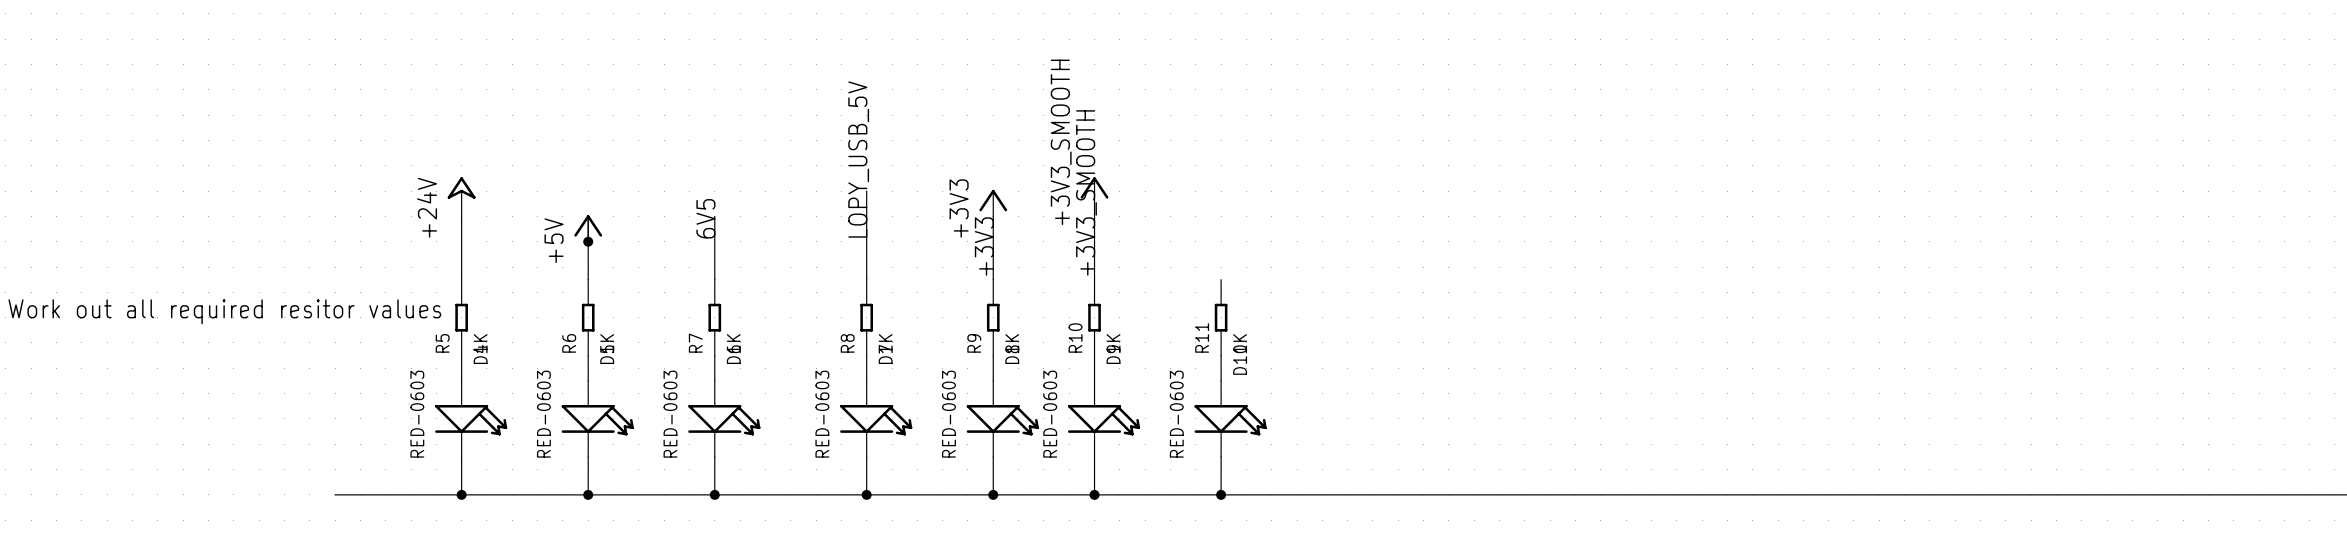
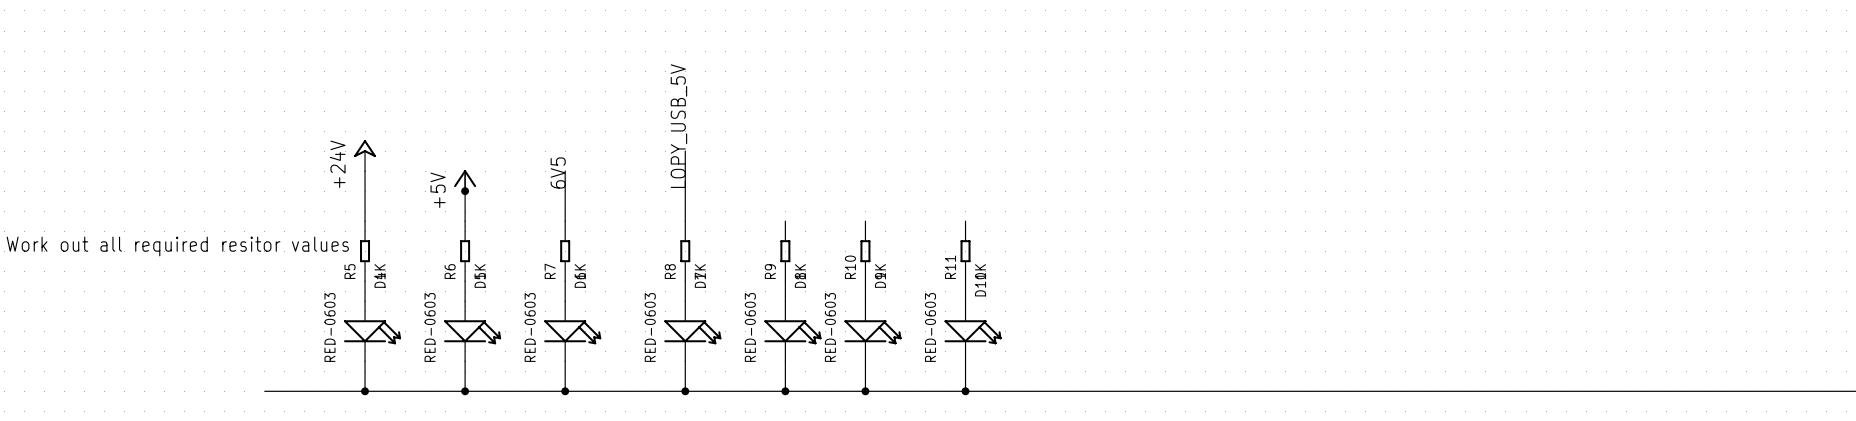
power symbol: +3V3_SMOOTH (1094, 190) -> none
label: +3V3_SMOOTH (1086, 192) -> none
power symbol: +3V3 (993, 203) -> none
wire: (1094, 203) (1094, 279) -> none
wire: (993, 216) (993, 279) -> none
label: +3V3 (984, 246) -> none

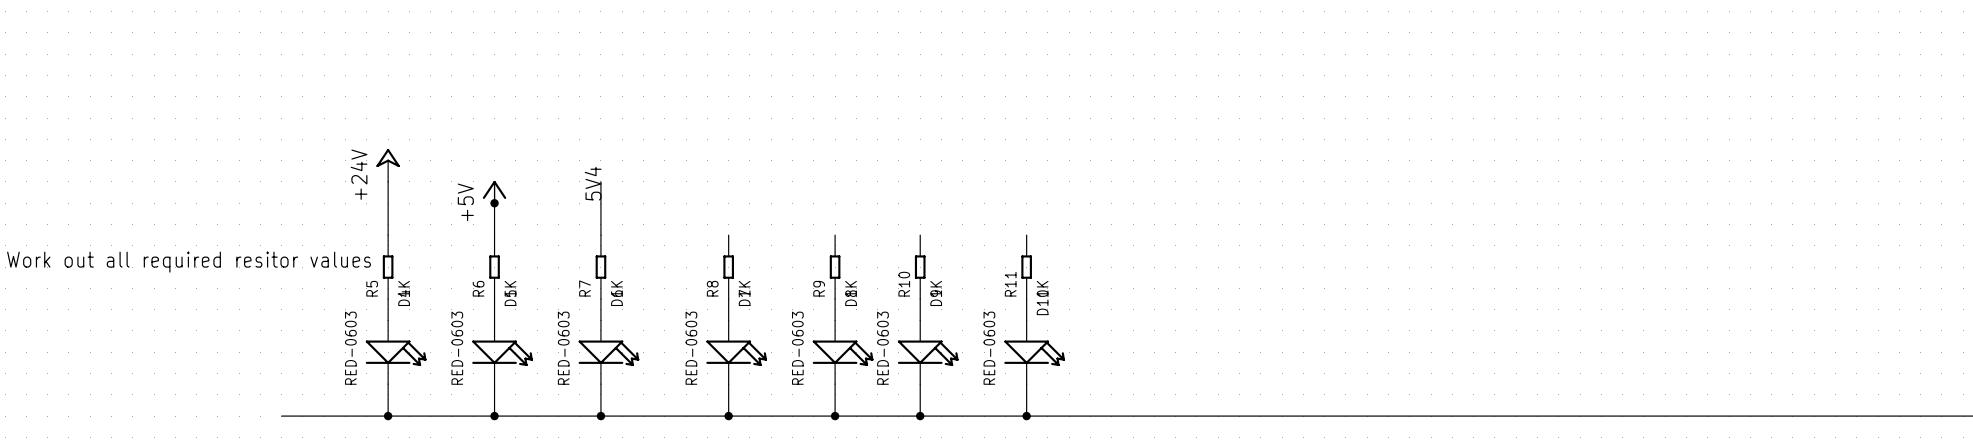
label: LOPY_USB_5V (678, 126) -> none
wire: (685, 151) (685, 221) -> none
label: 6V5 (558, 172) -> 5V4 (593, 183)

